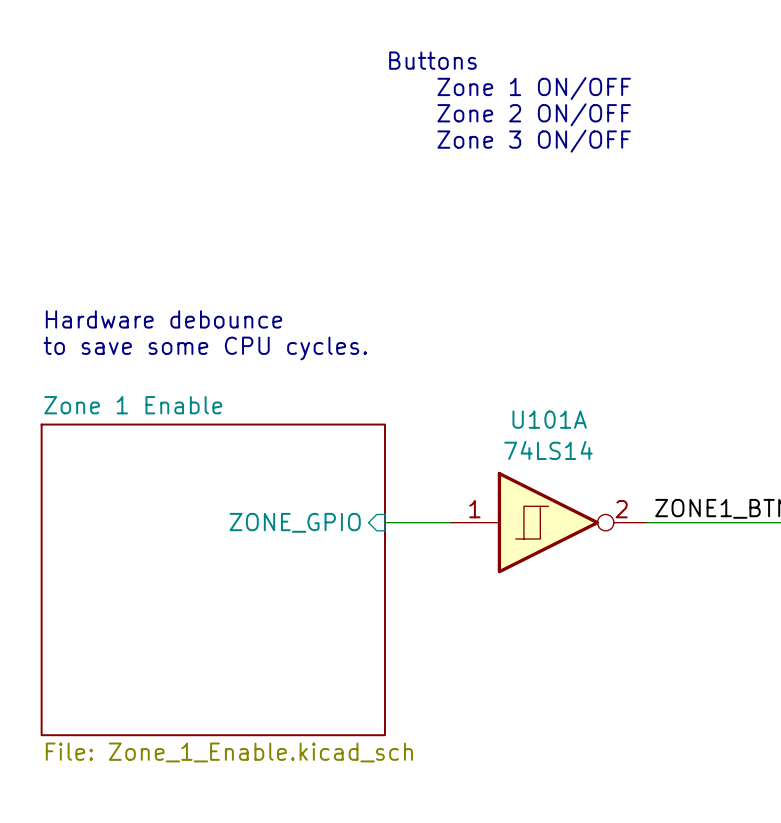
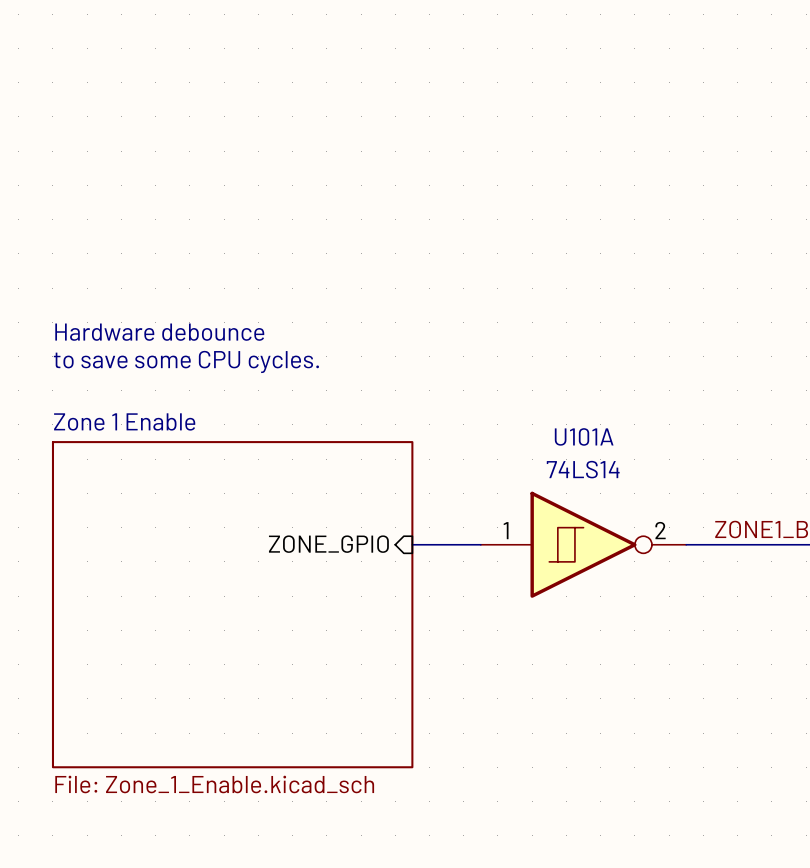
text: Buttons (432, 60) -> none
text: Zone 1 ON/OFF (534, 88) -> none
text: Zone 2 ON/OFF (534, 114) -> none
text: Zone 3 ON/OFF (534, 141) -> none

